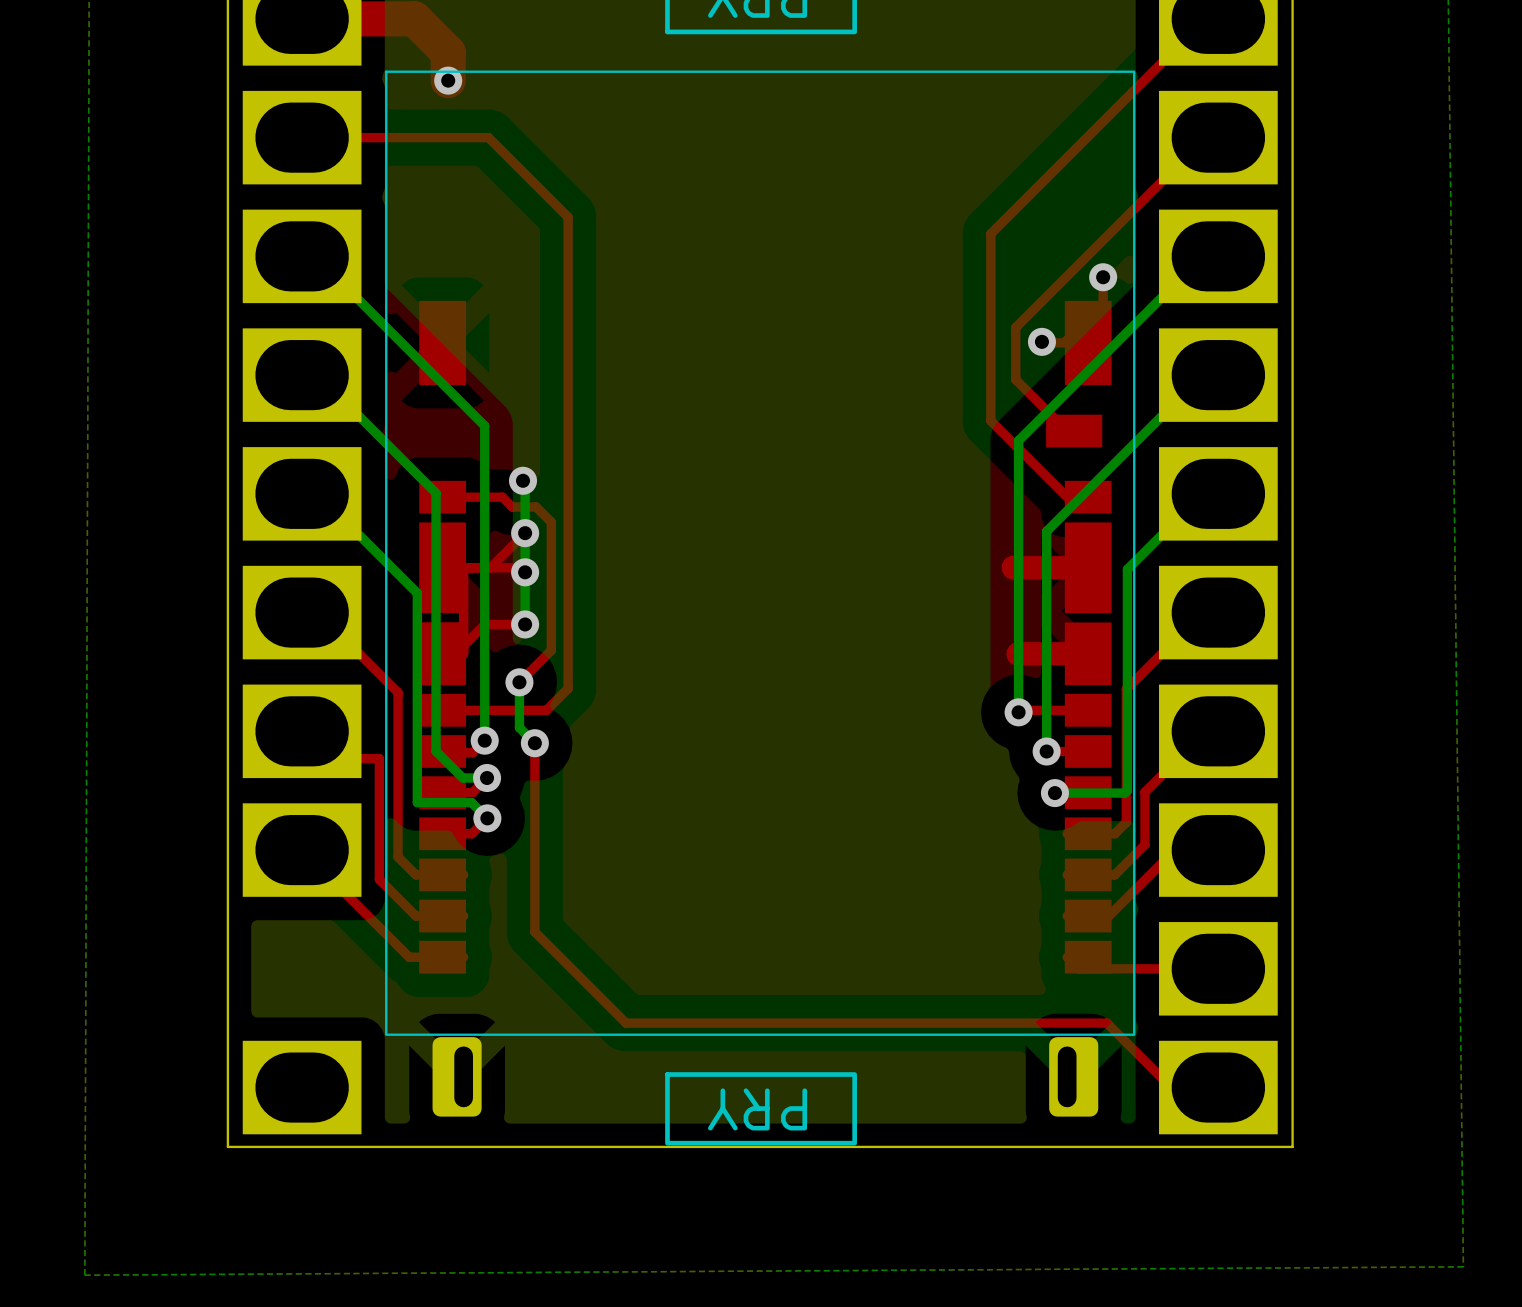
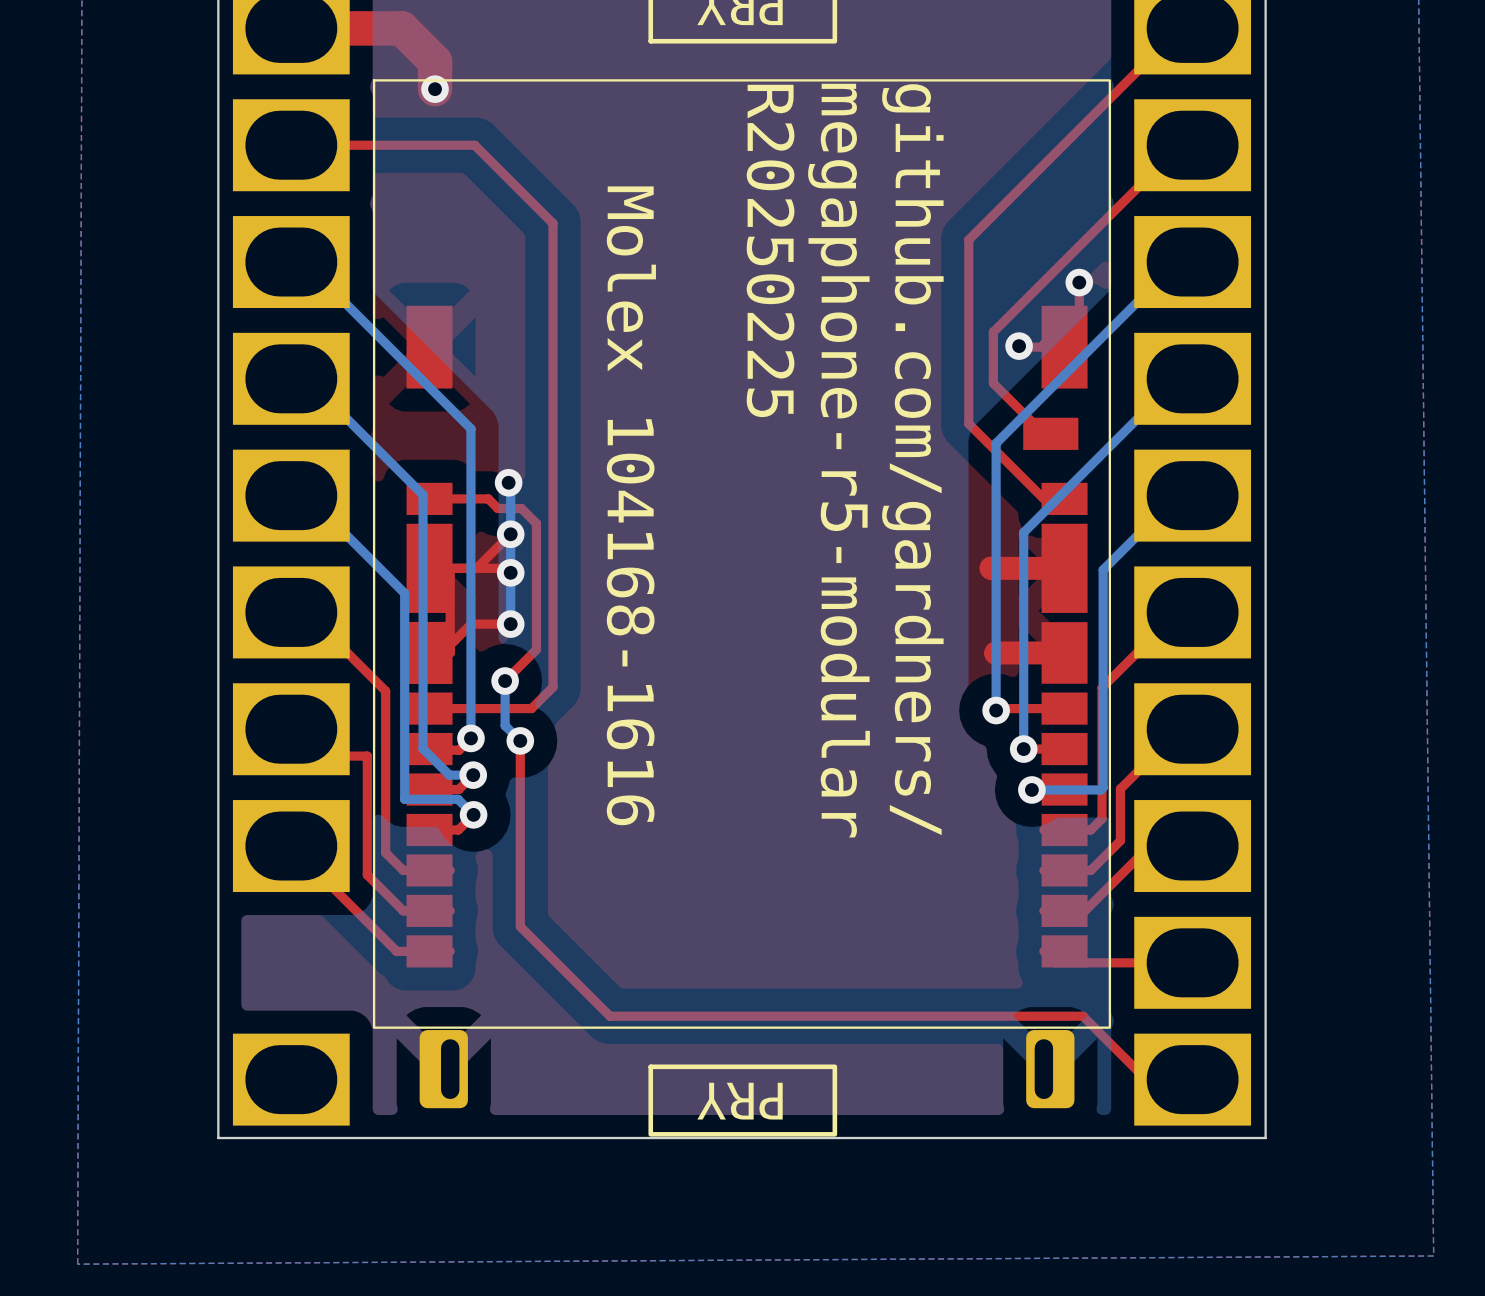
text: none -> R20250225 (770, 250)
text: none -> github.com/gardners/ (912, 459)
text: none -> megaphone-r5-modular (838, 460)
text: none -> Molex 104168-1616 (631, 505)

